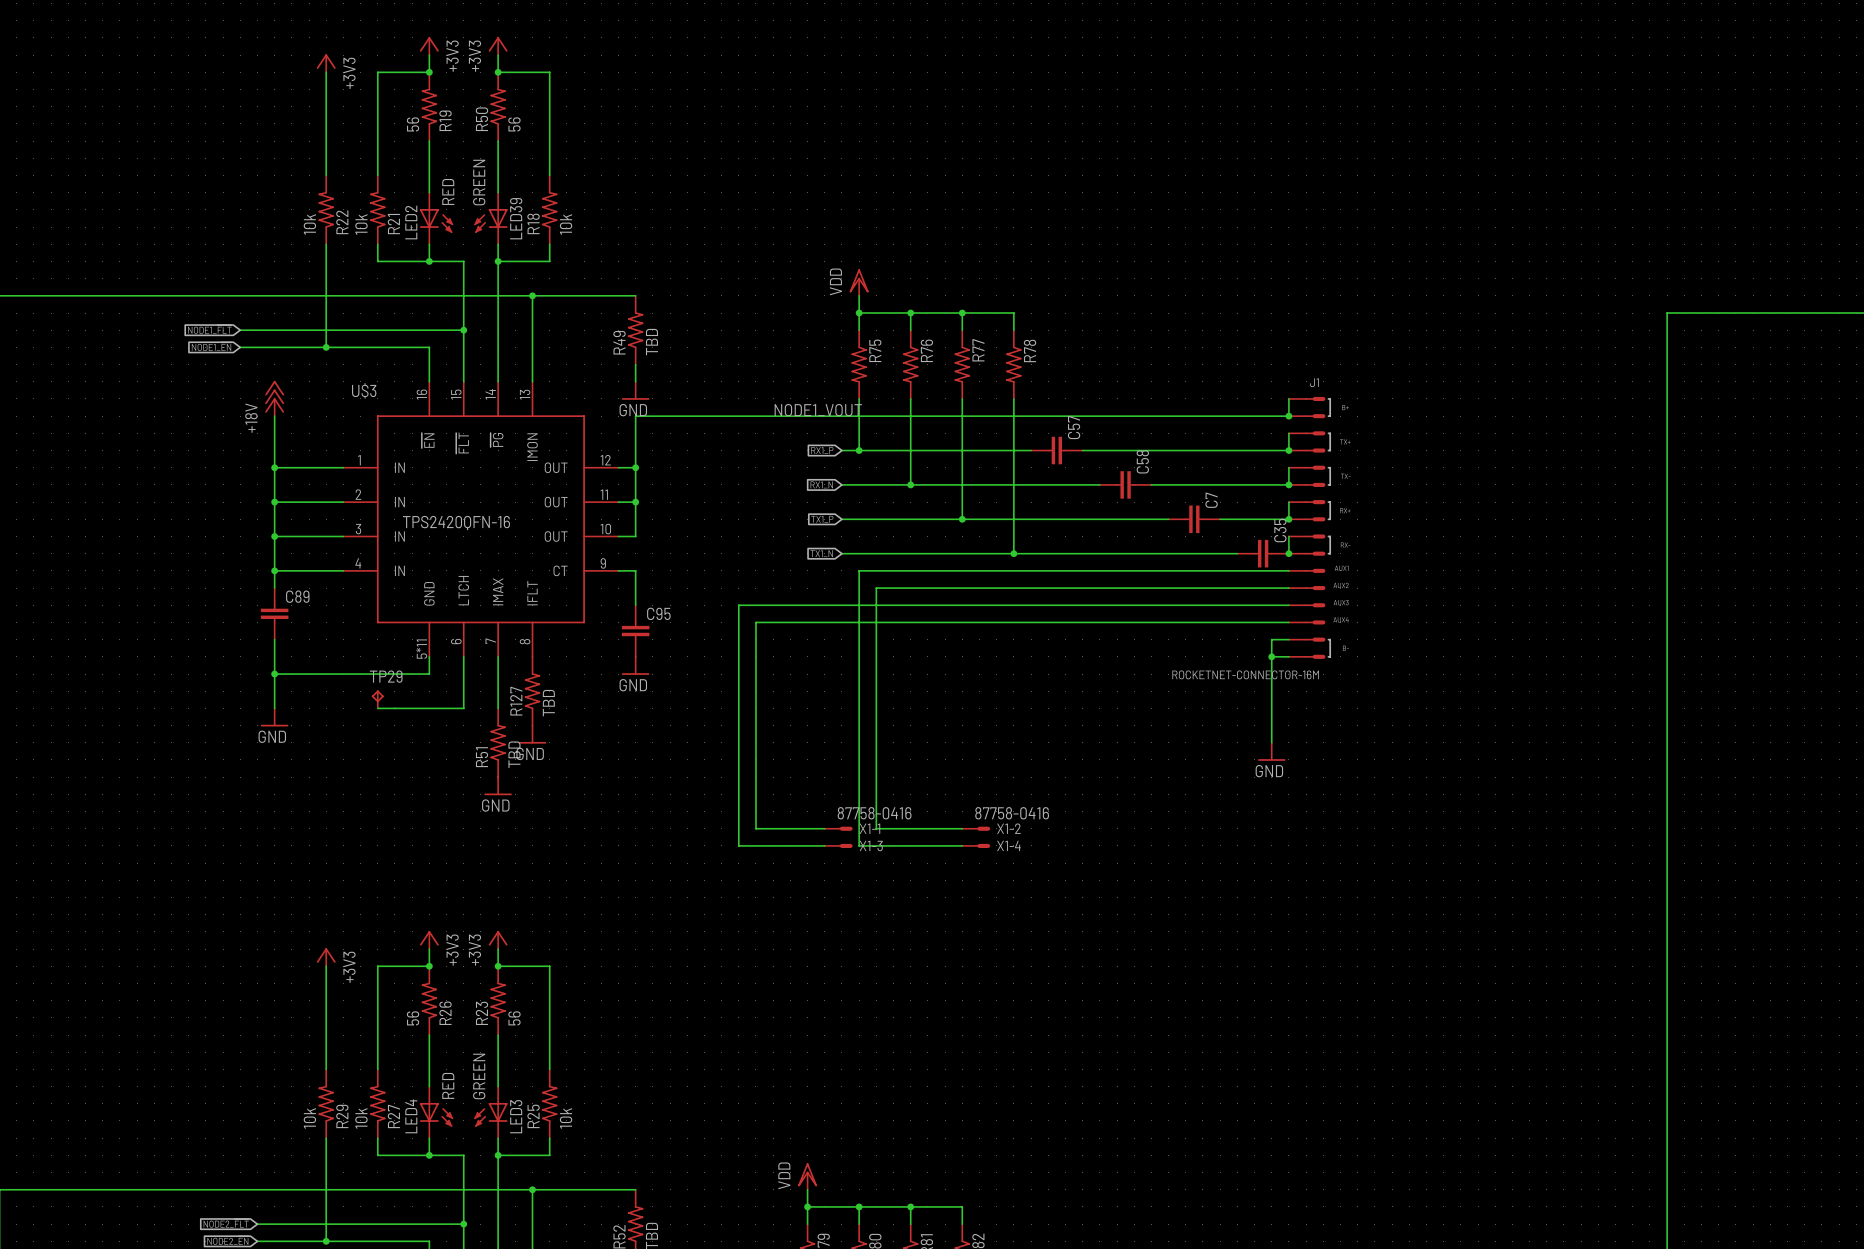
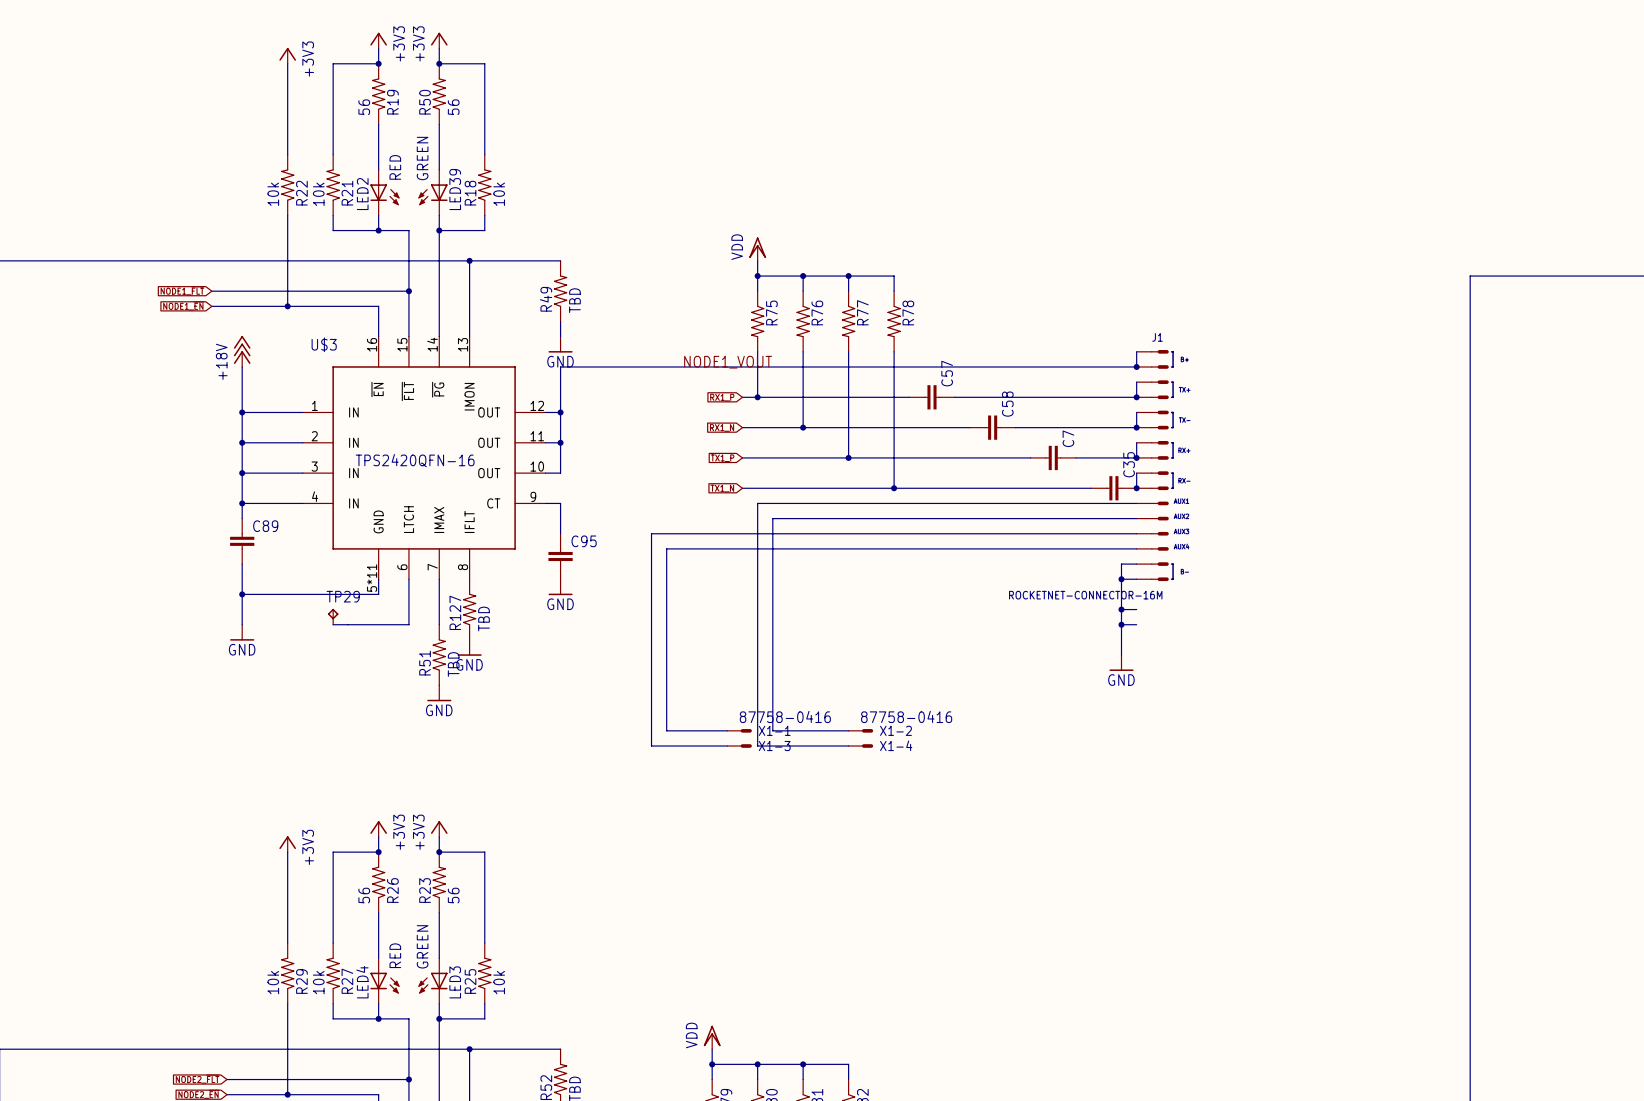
wire: none -> (1121, 609) (1136, 609)
junction: none -> (1121, 609)
wire: none -> (1121, 624) (1136, 624)
junction: none -> (1121, 624)

